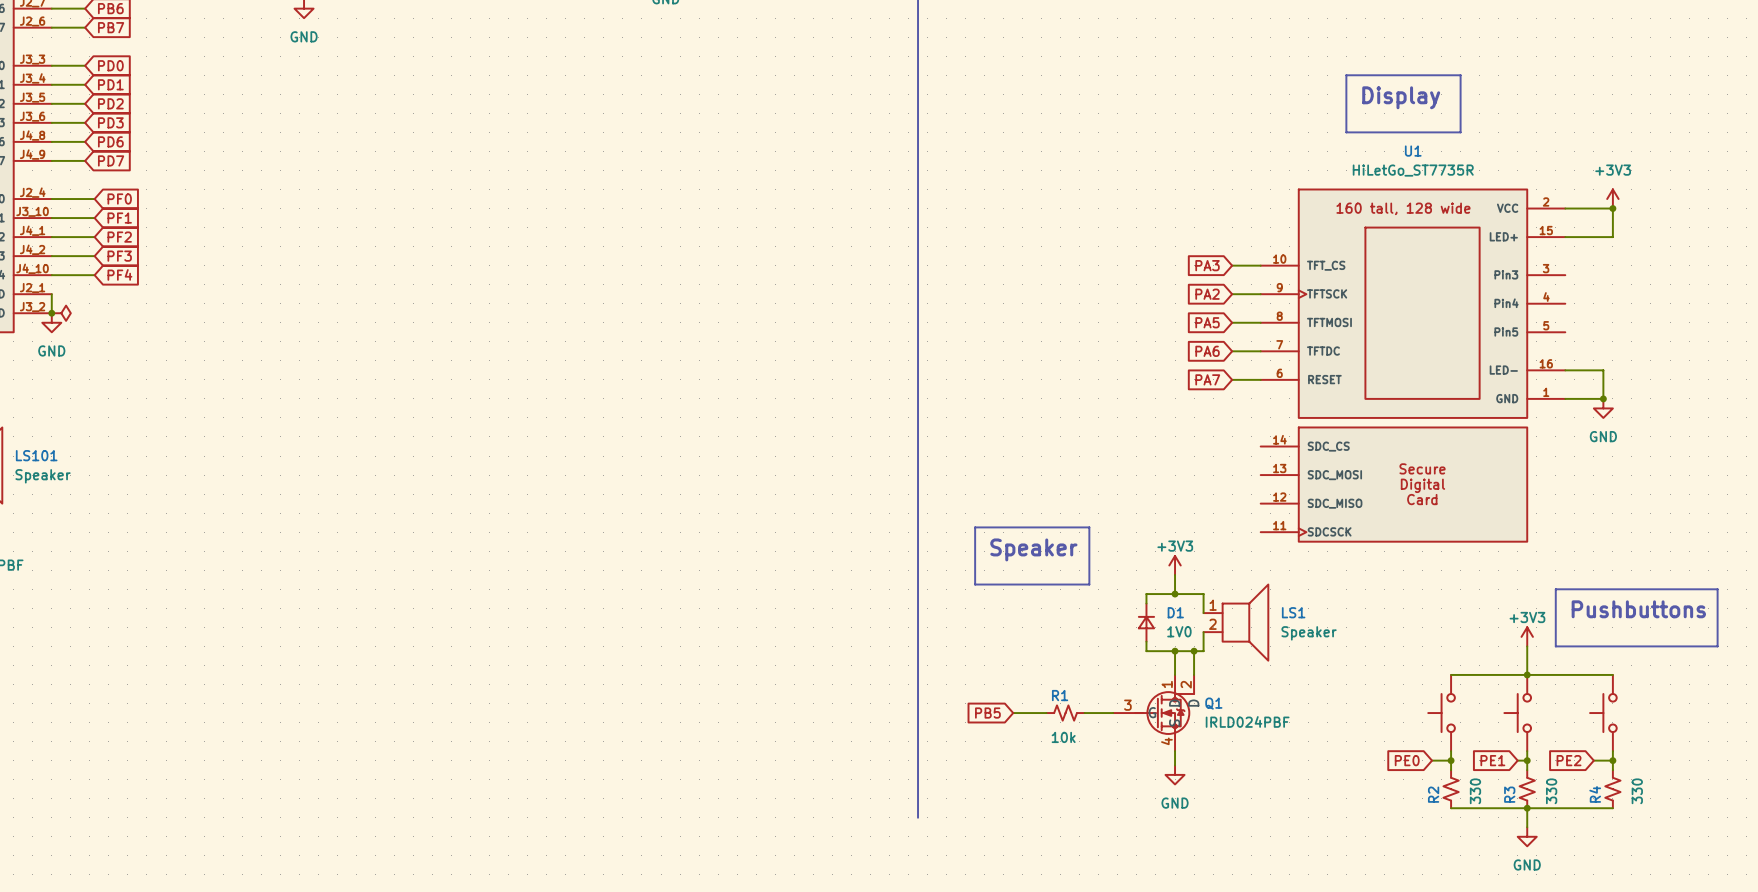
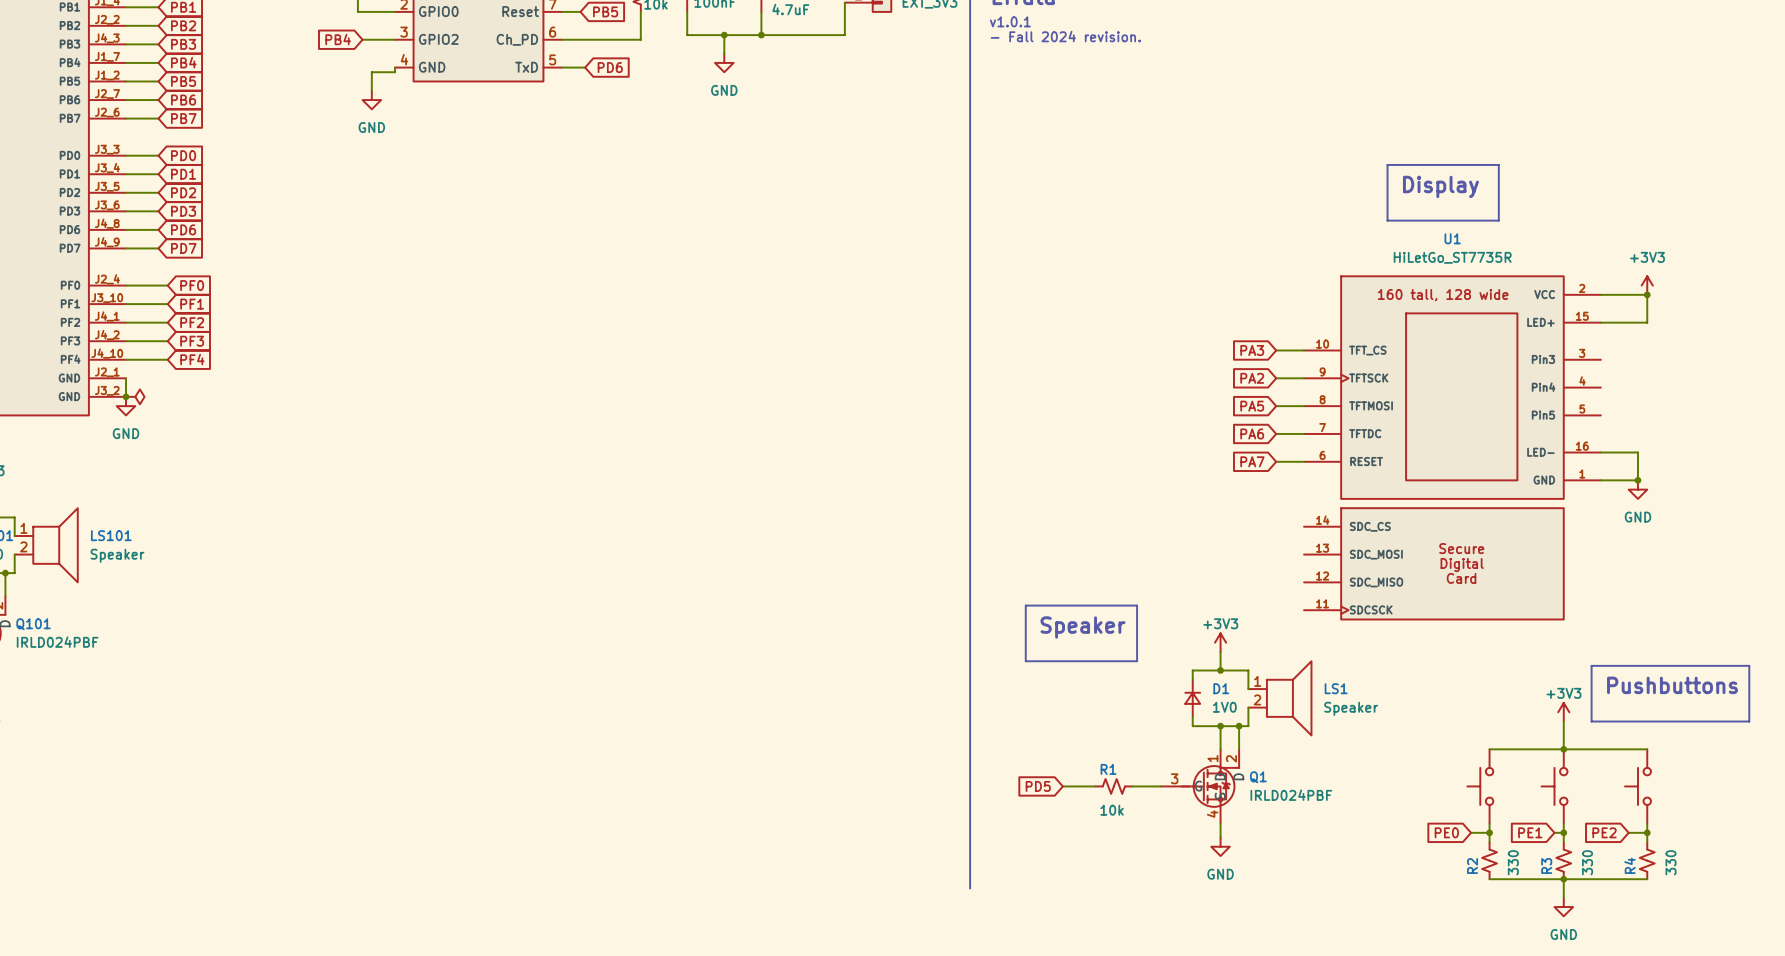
global label: PB5 (987, 713) -> PD5 (1038, 786)

